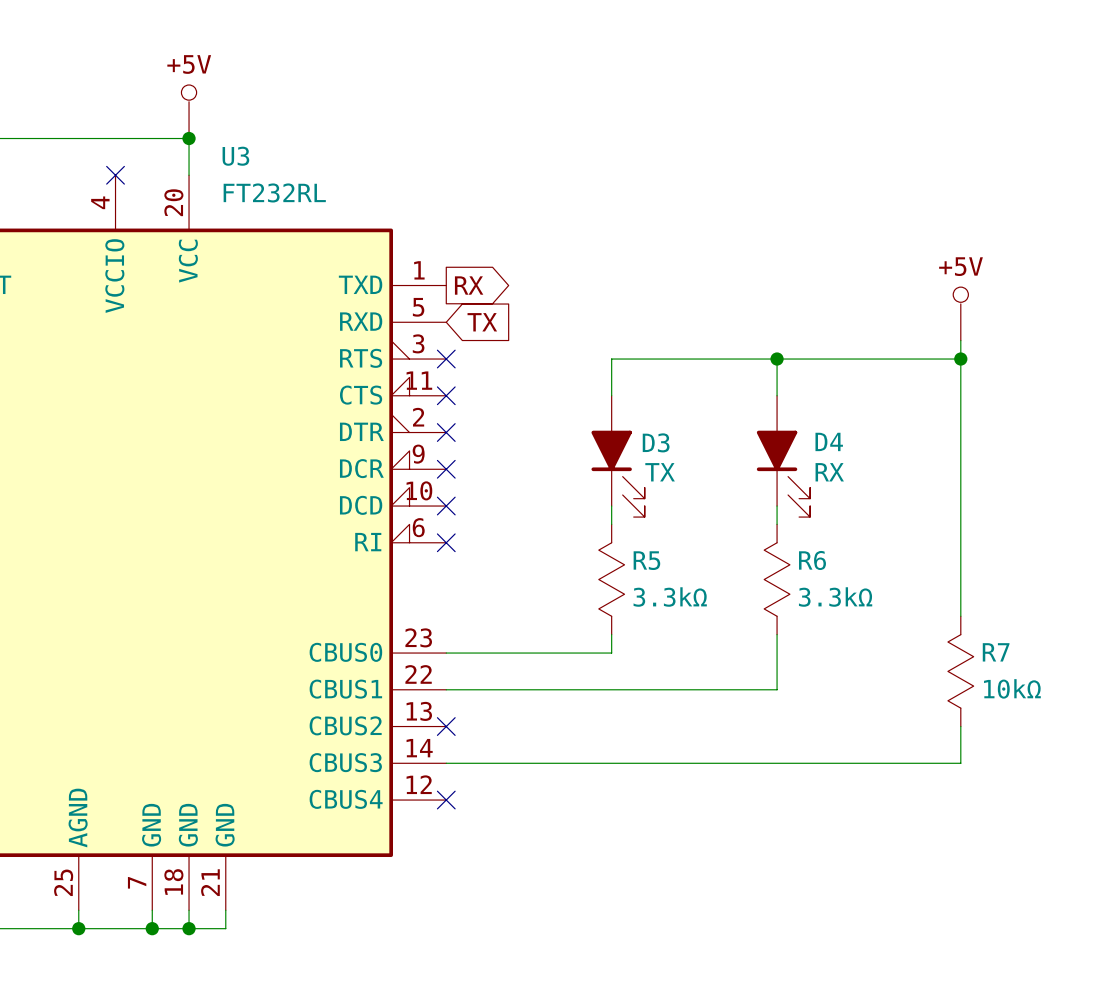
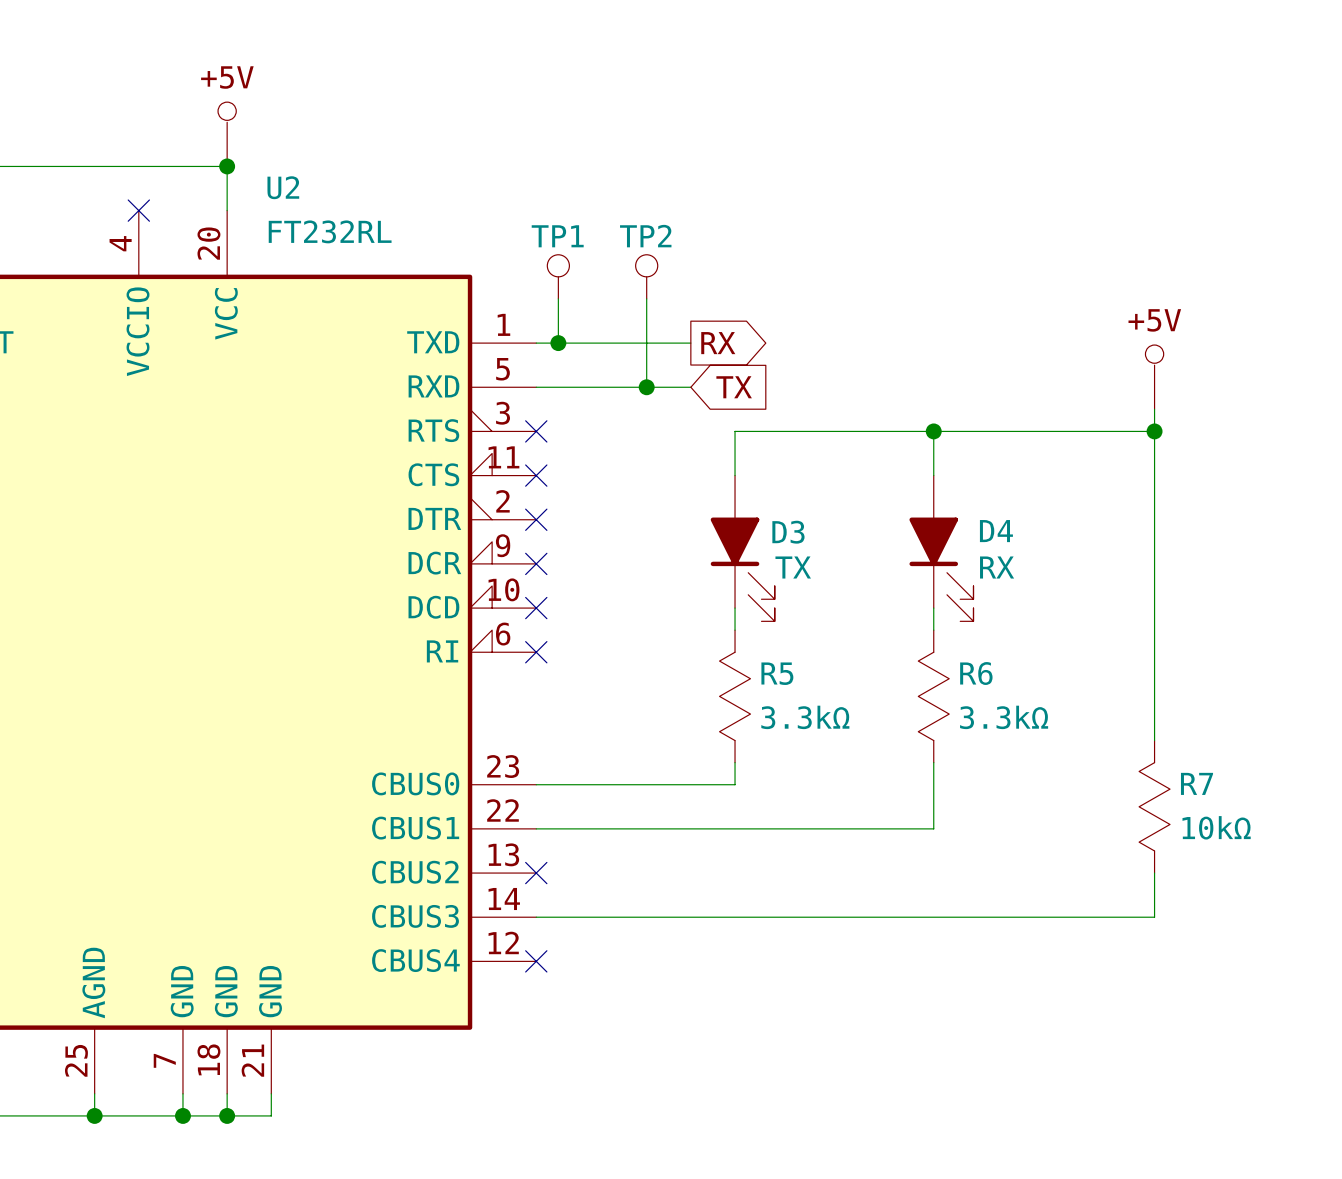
U3 name: U3 (235, 156) -> U2 (283, 187)
TP1: none -> (558, 276)
TP2: none -> (646, 276)
wire: none -> (558, 298) (558, 343)
wire: none -> (646, 298) (646, 387)
wire: none -> (536, 343) (690, 343)
junction: none -> (558, 343)
global label position: RX (469, 285) -> RX (718, 343)
wire: none -> (536, 387) (690, 387)
global label position: TX (482, 322) -> TX (734, 387)
junction: none -> (646, 387)

